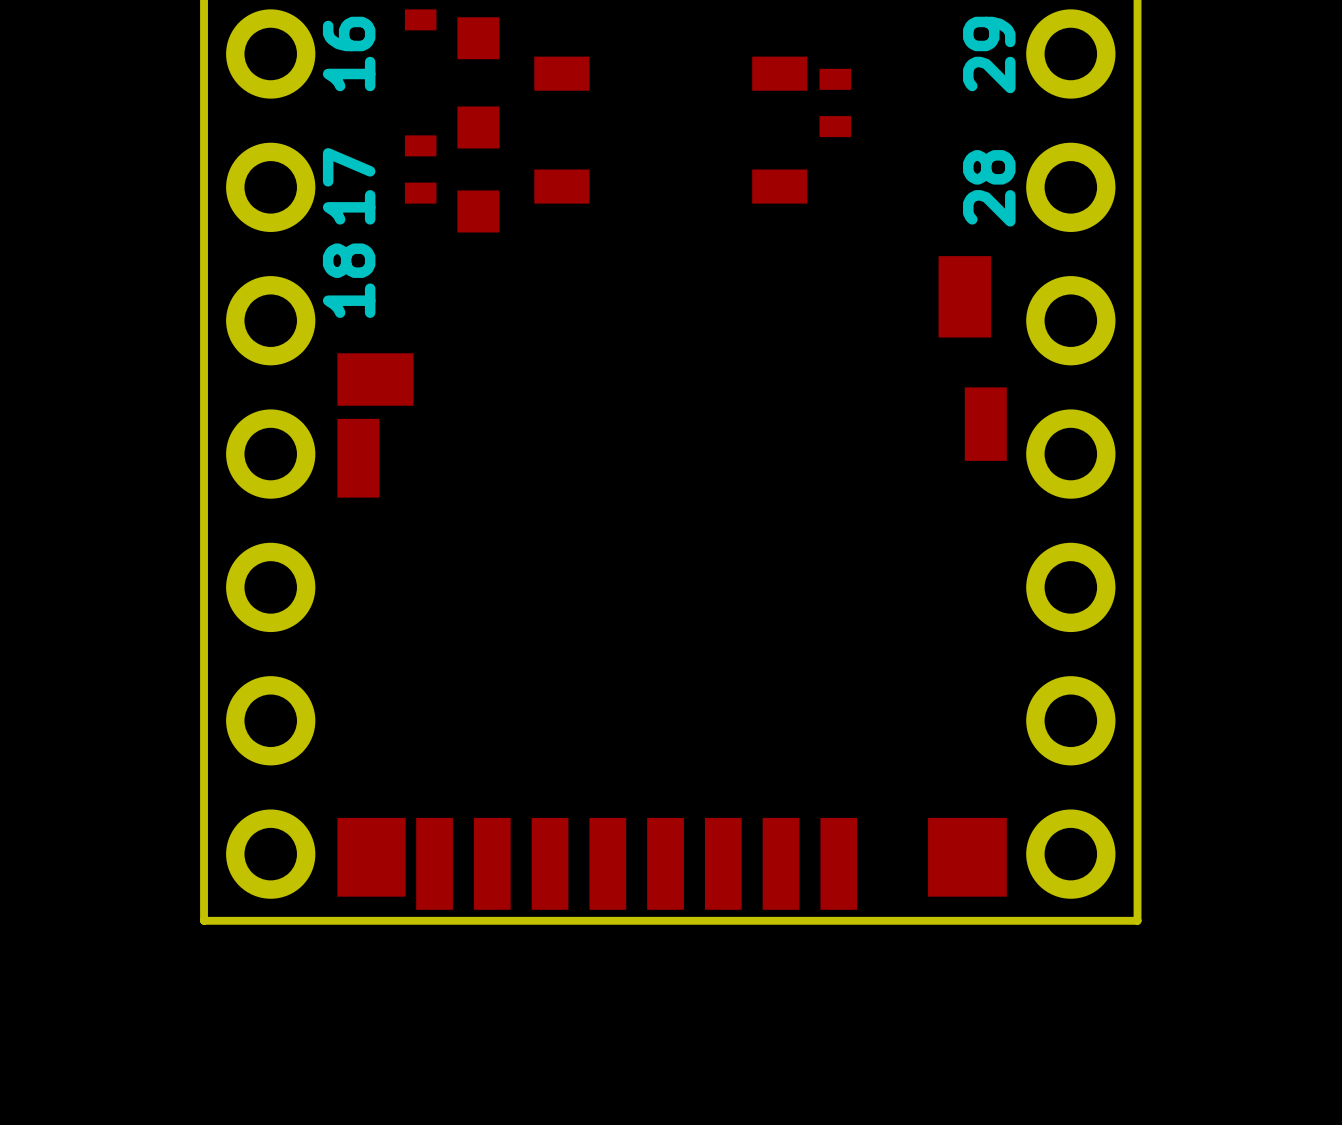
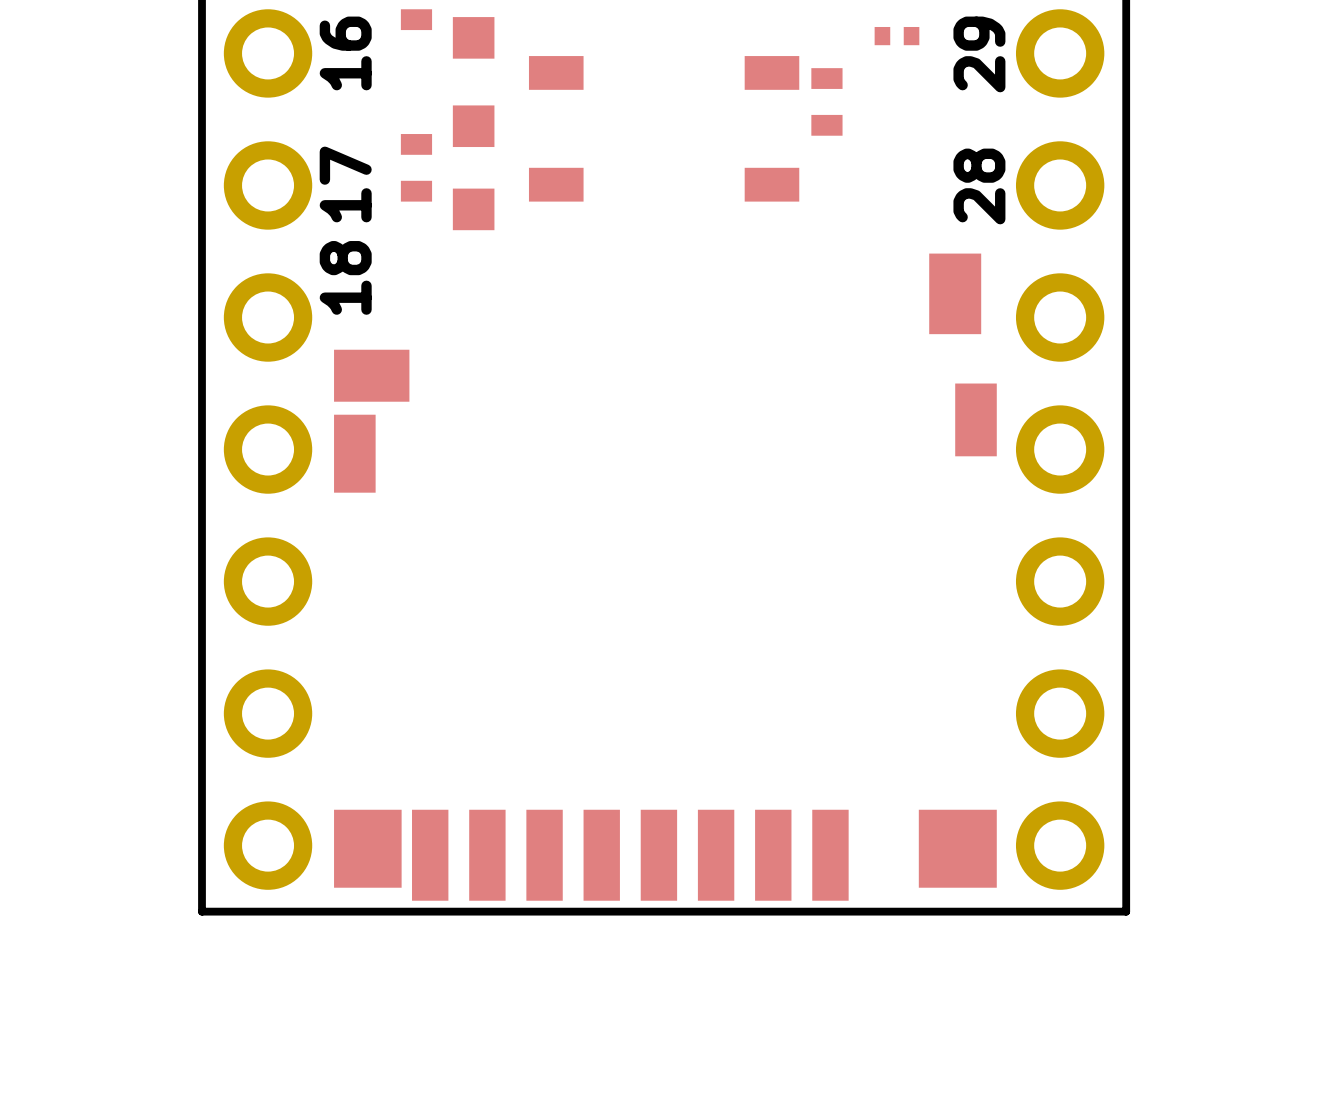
part: none -> (896, 36)

